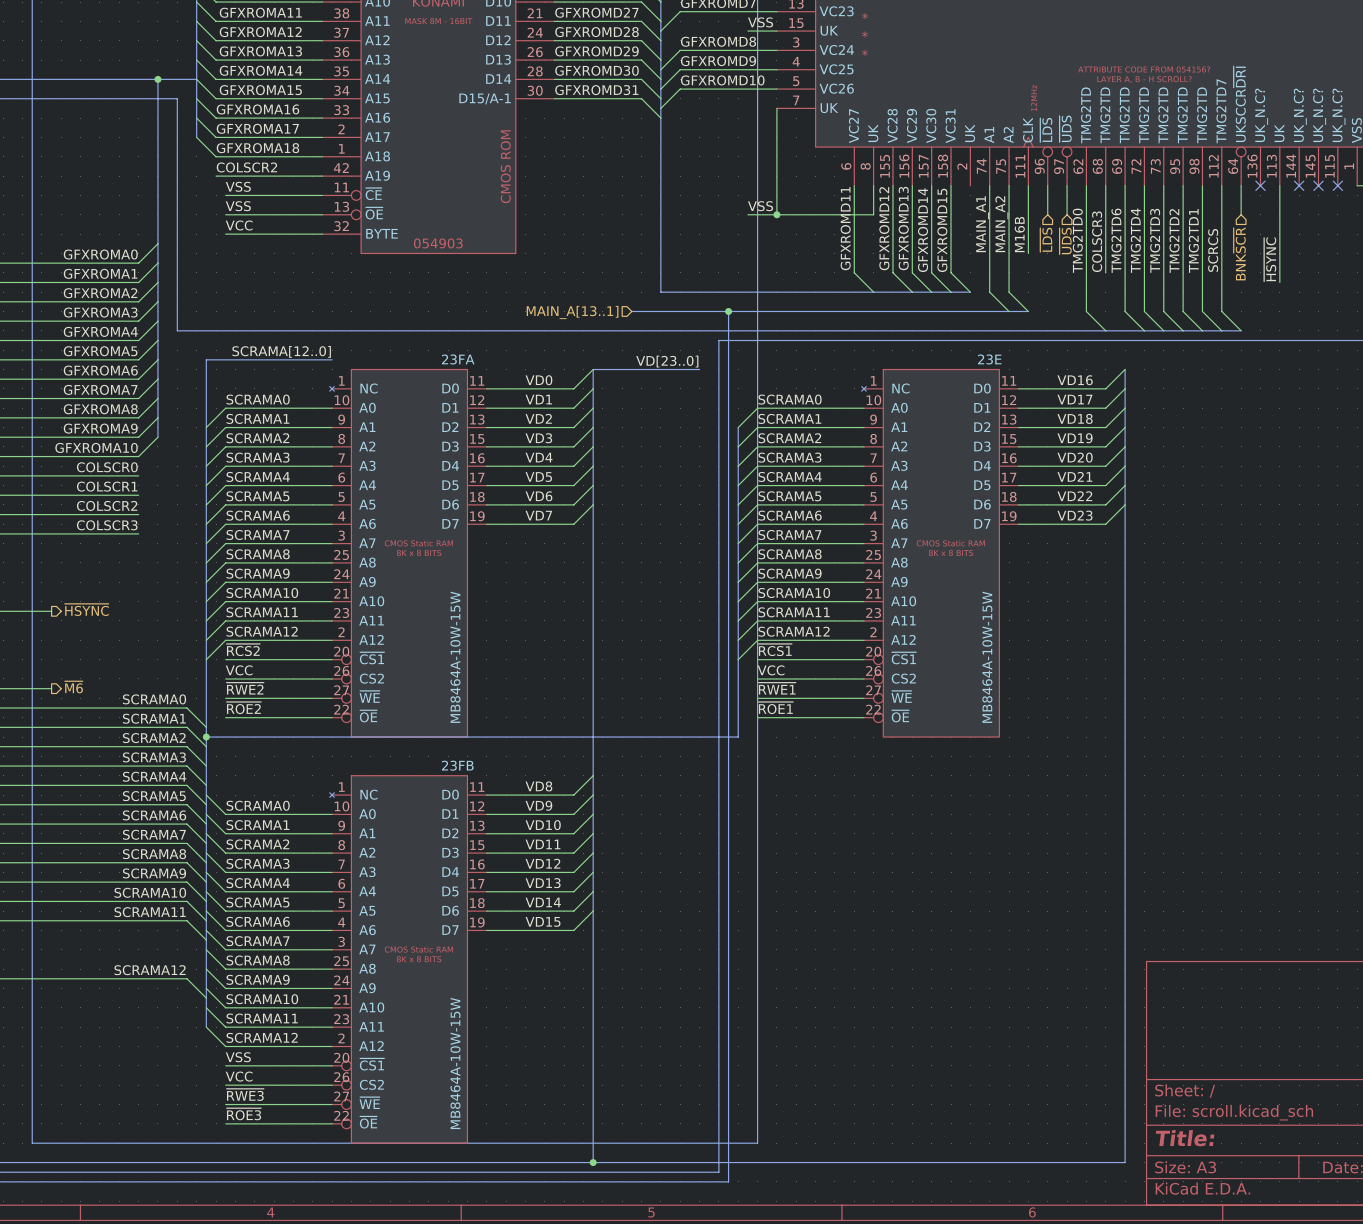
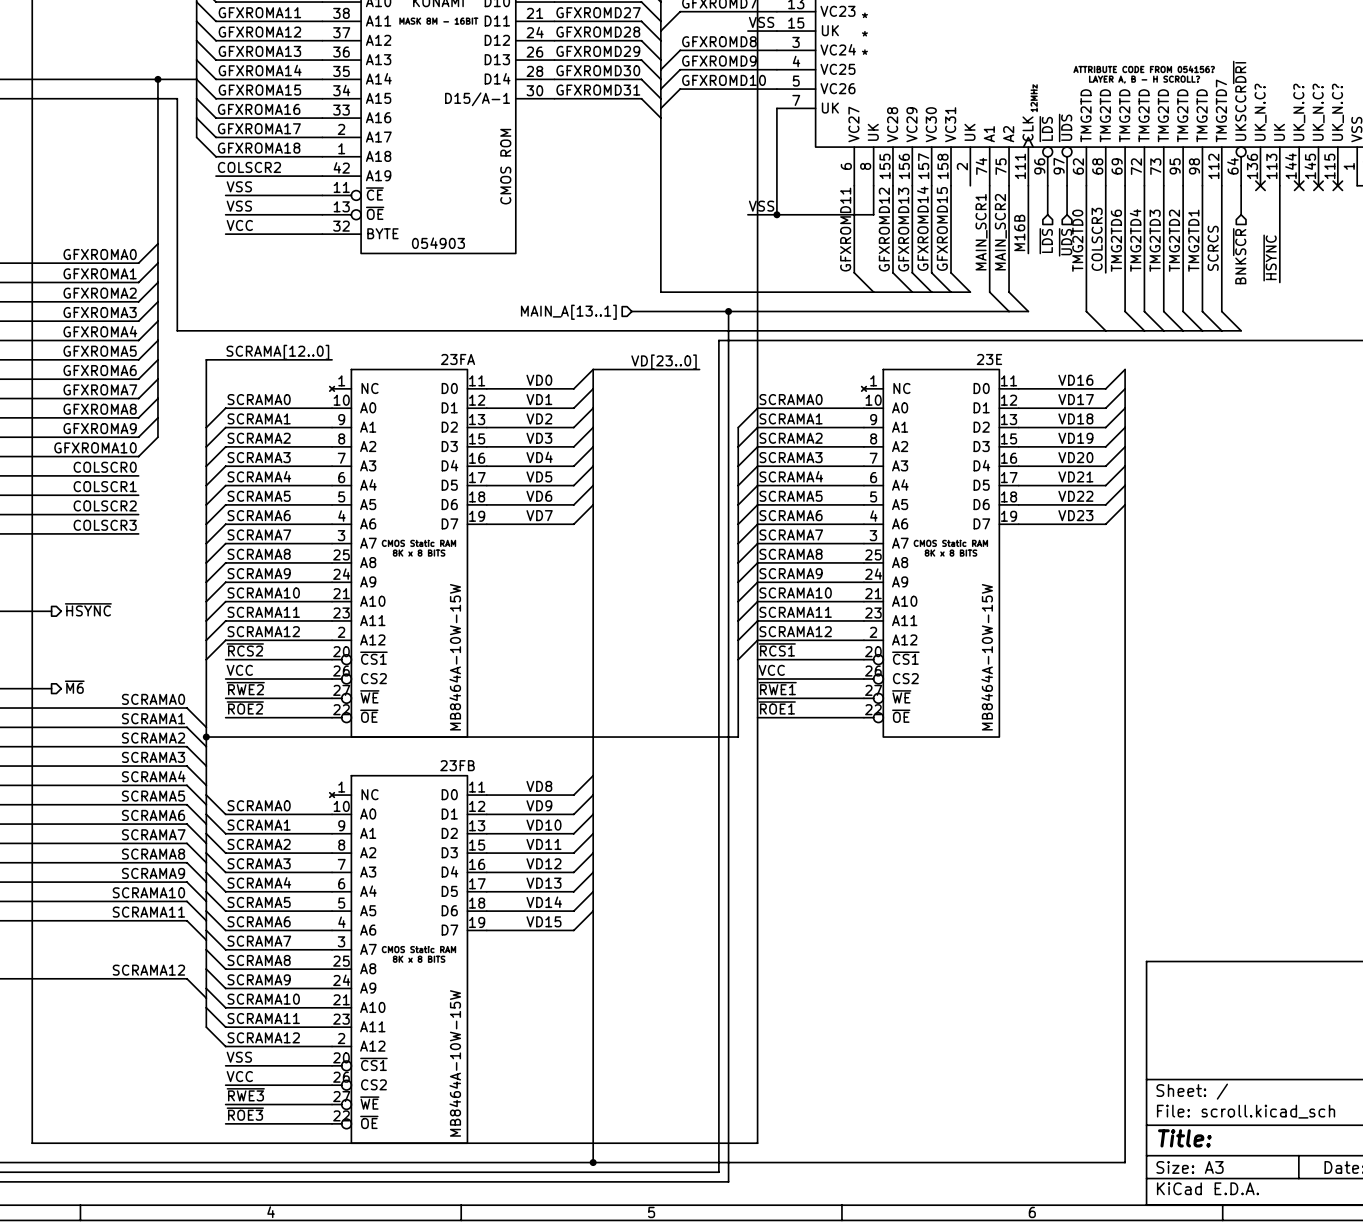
label: MAIN_A1 (982, 224) -> none
label: MAIN_A2 (1001, 224) -> none
label: none -> MAIN_SCR1 (981, 232)
label: none -> MAIN_SCR2 (1000, 232)

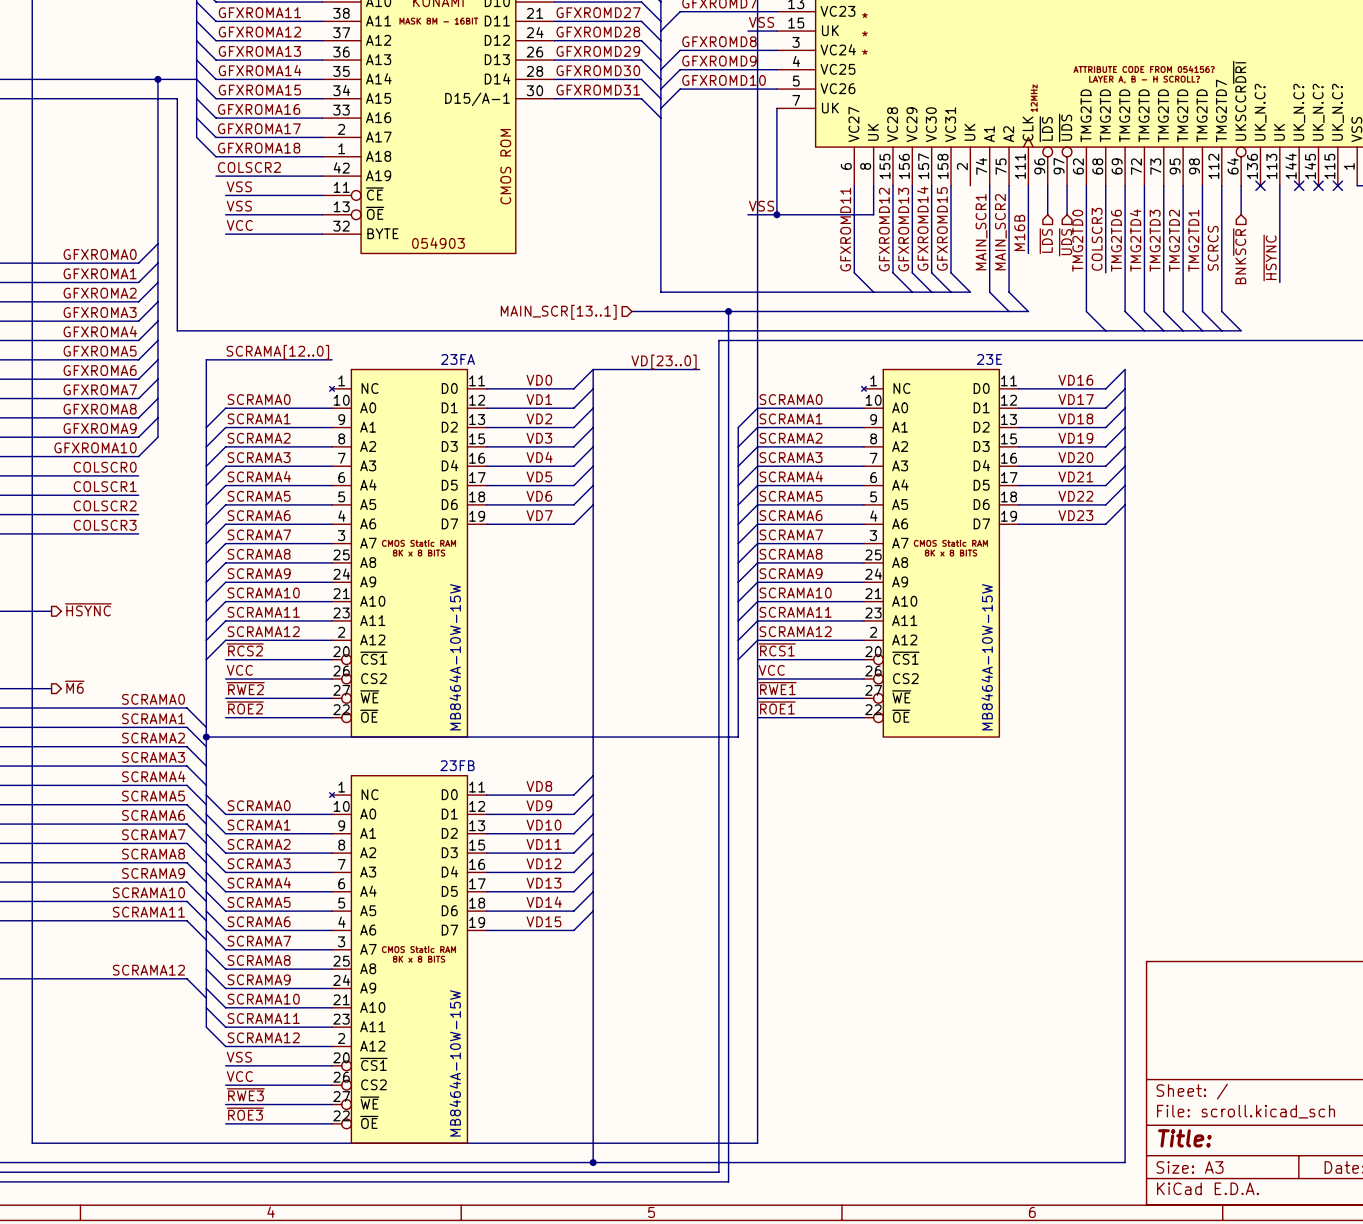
hierarchical label: MAIN_A[13..1] (568, 312) -> MAIN_SCR[13..1] (558, 312)

